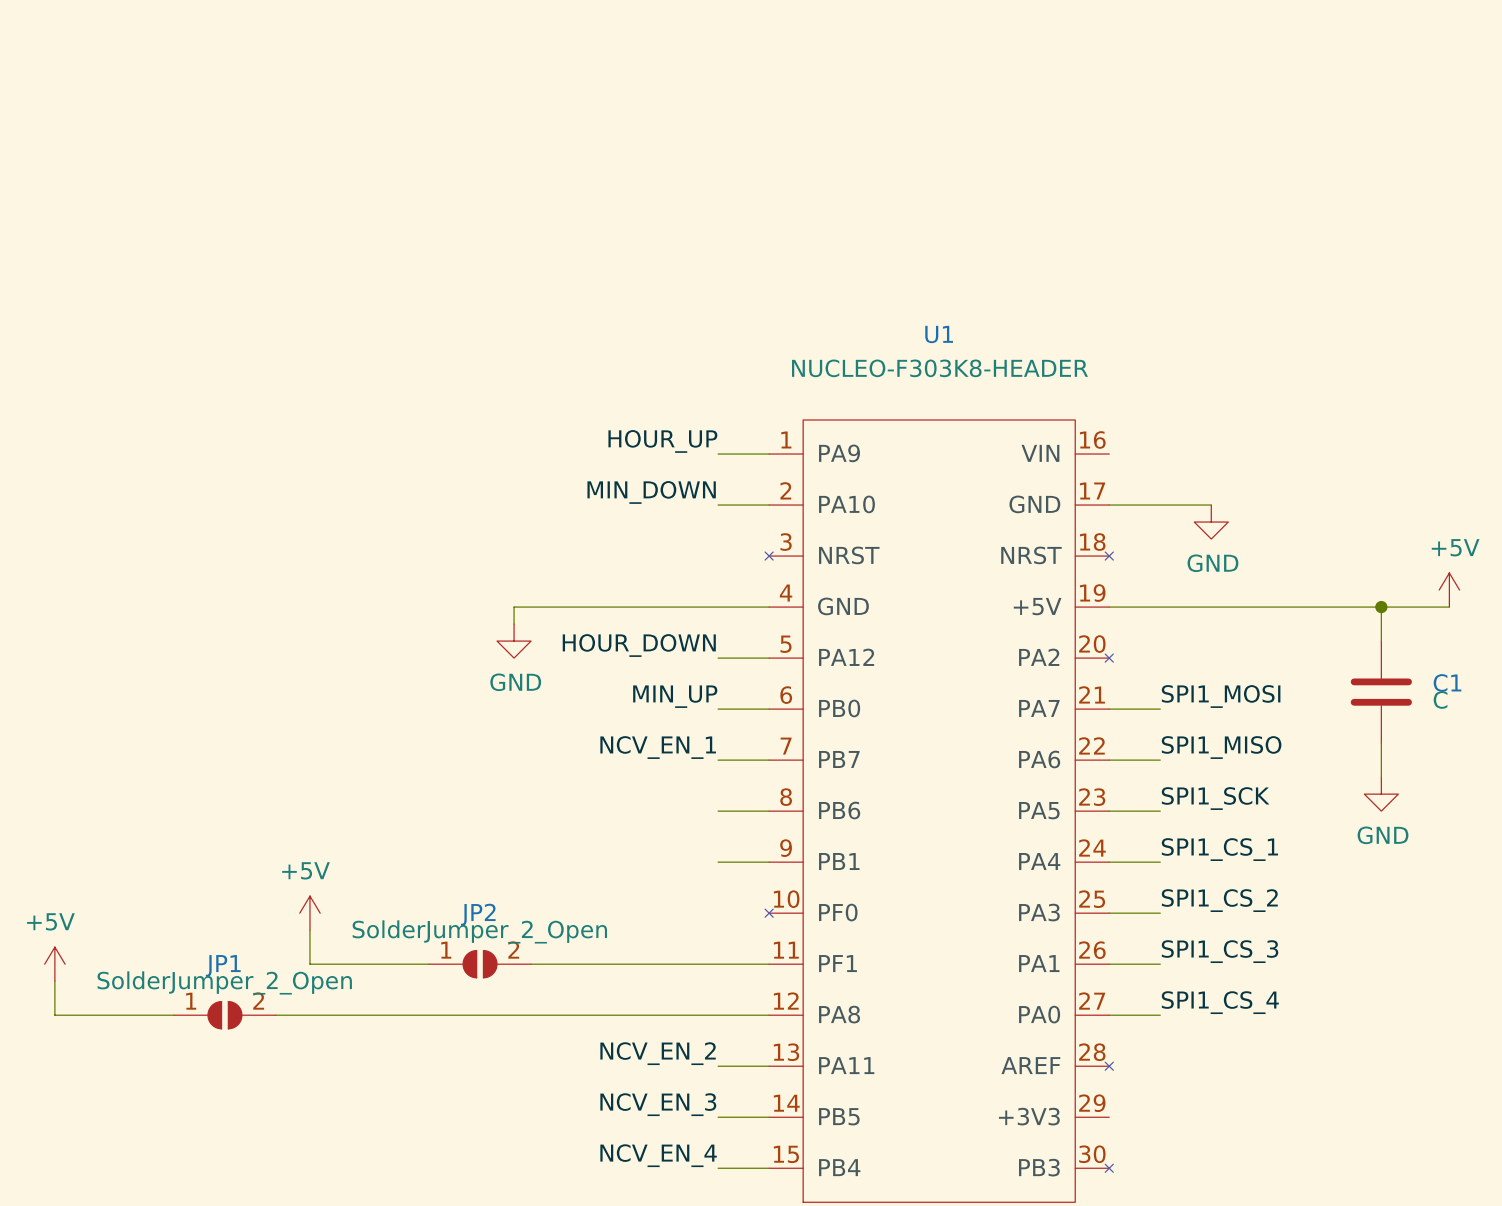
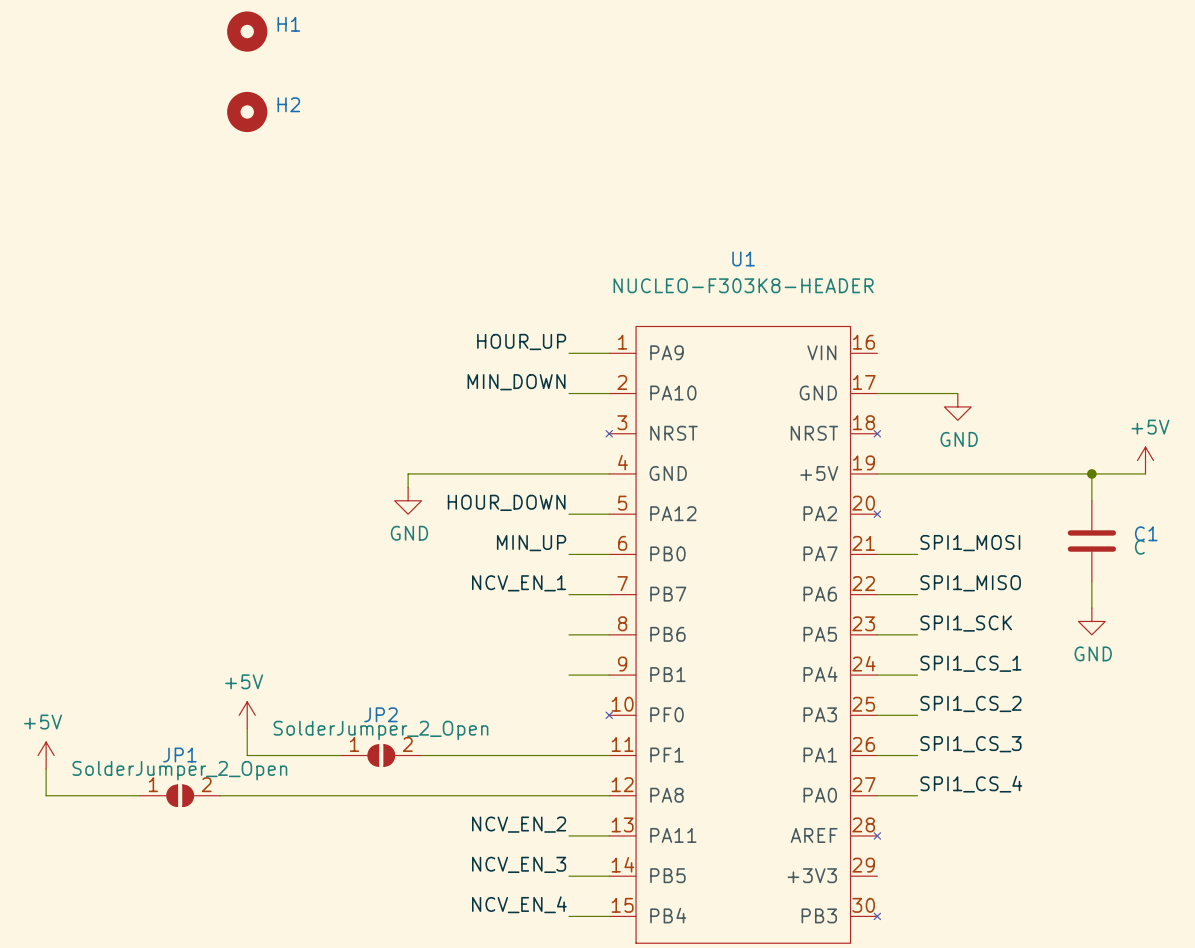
H1: none -> (247, 31)
H2: none -> (247, 111)

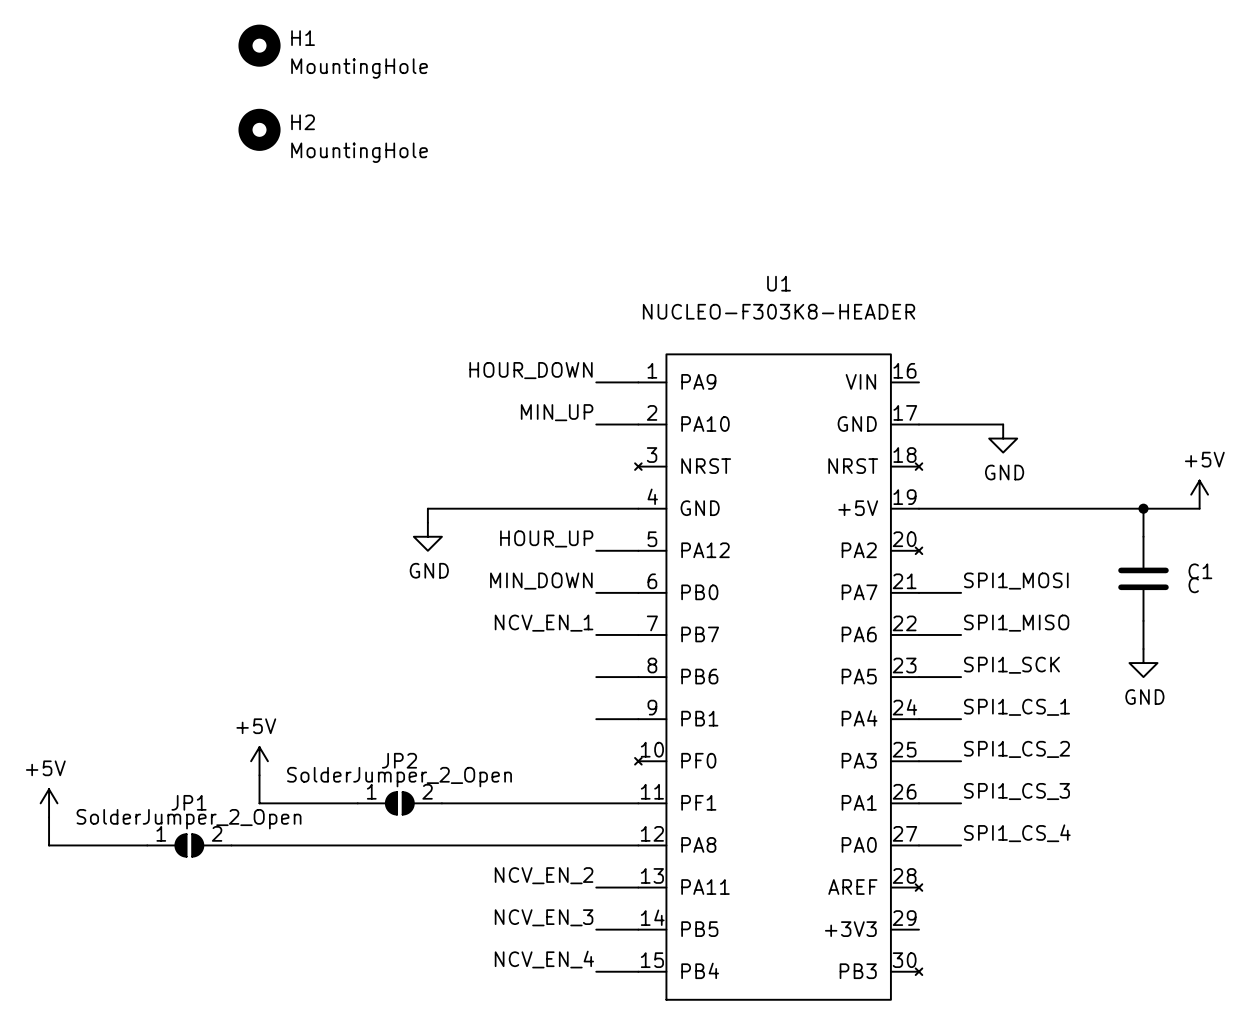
H1 value: none -> MountingHole (359, 68)
H2 value: none -> MountingHole (359, 152)
label: HOUR_UP (521, 341) -> HOUR_DOWN (531, 370)
label: MIN_DOWN (516, 382) -> MIN_UP (557, 412)
label: HOUR_DOWN (506, 502) -> HOUR_UP (546, 538)
label: MIN_UP (531, 543) -> MIN_DOWN (541, 581)

